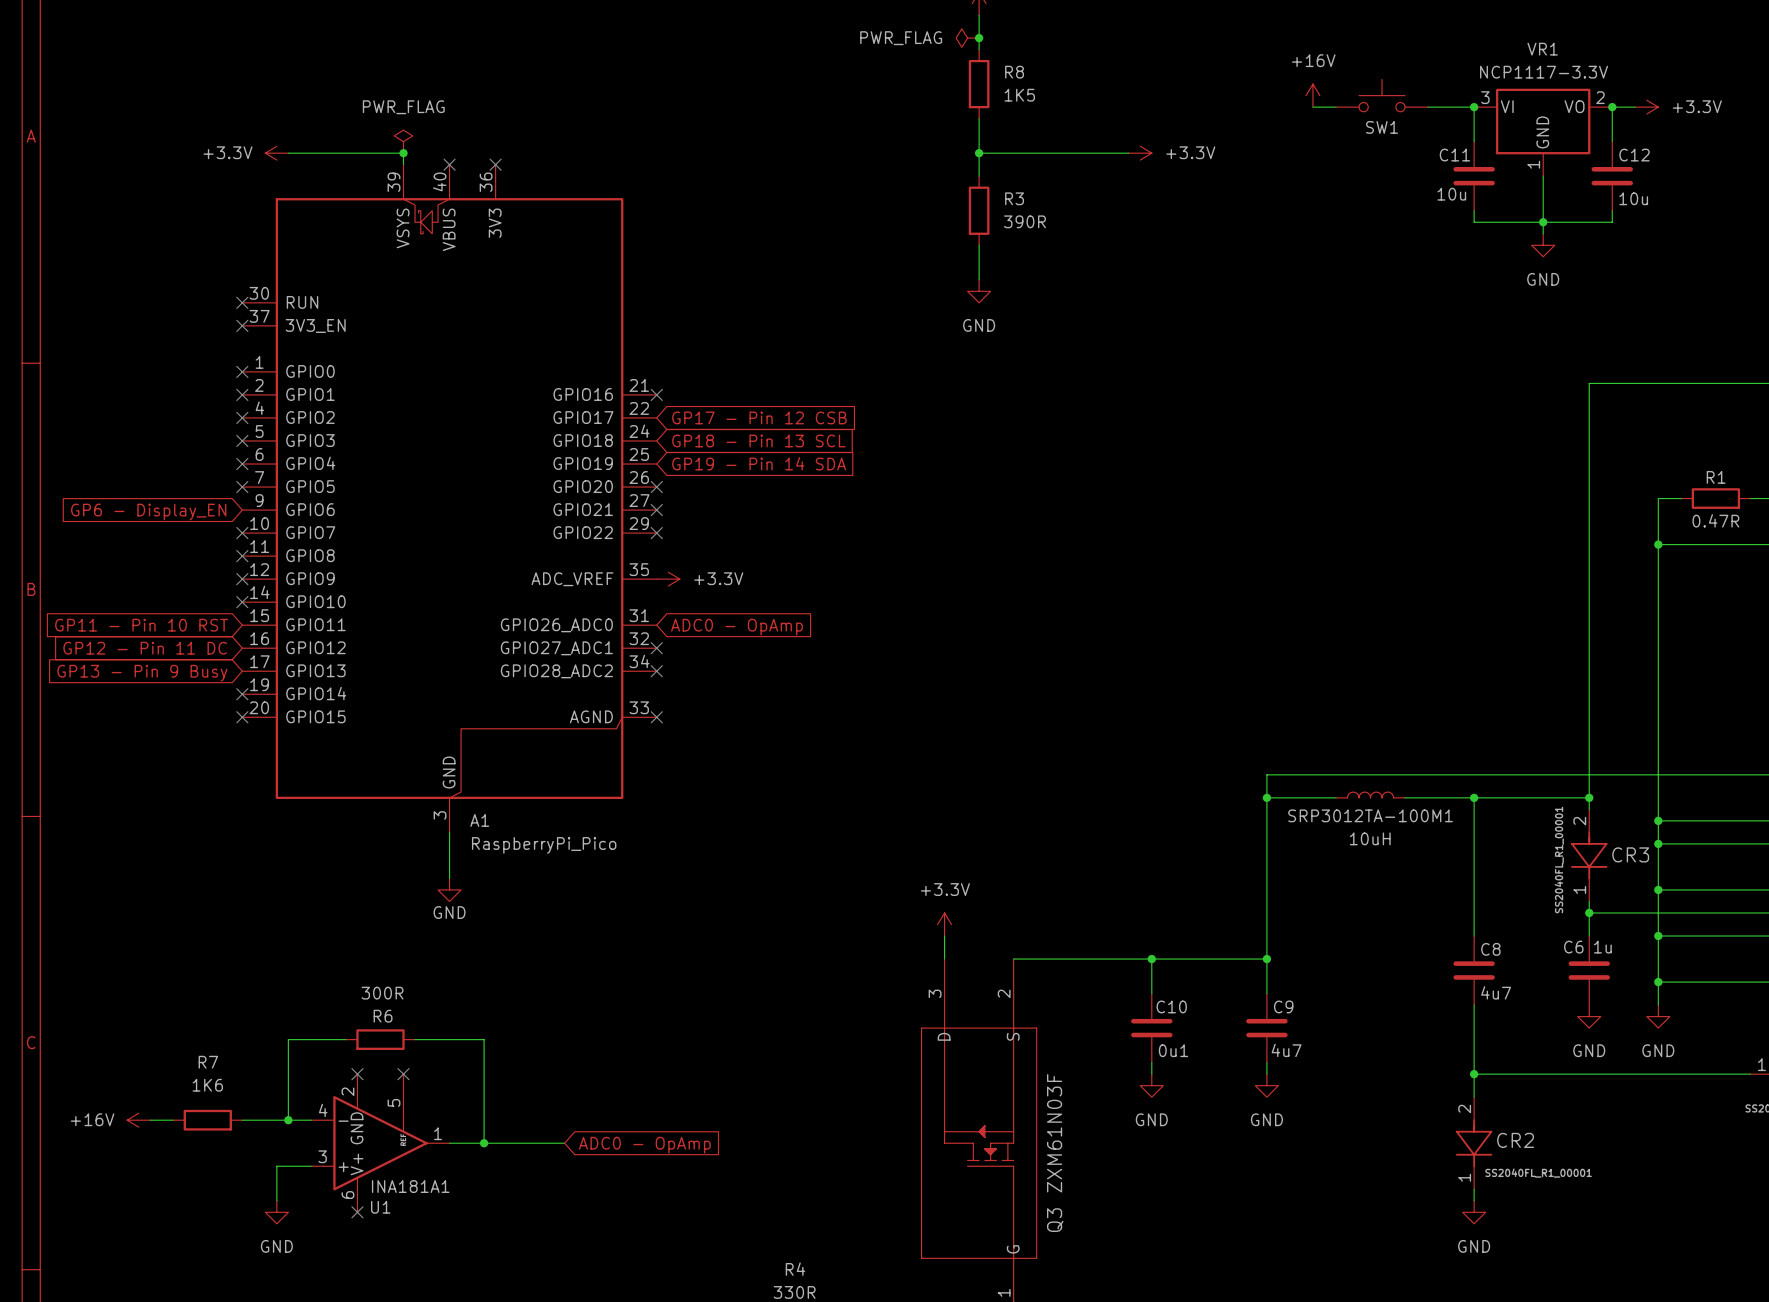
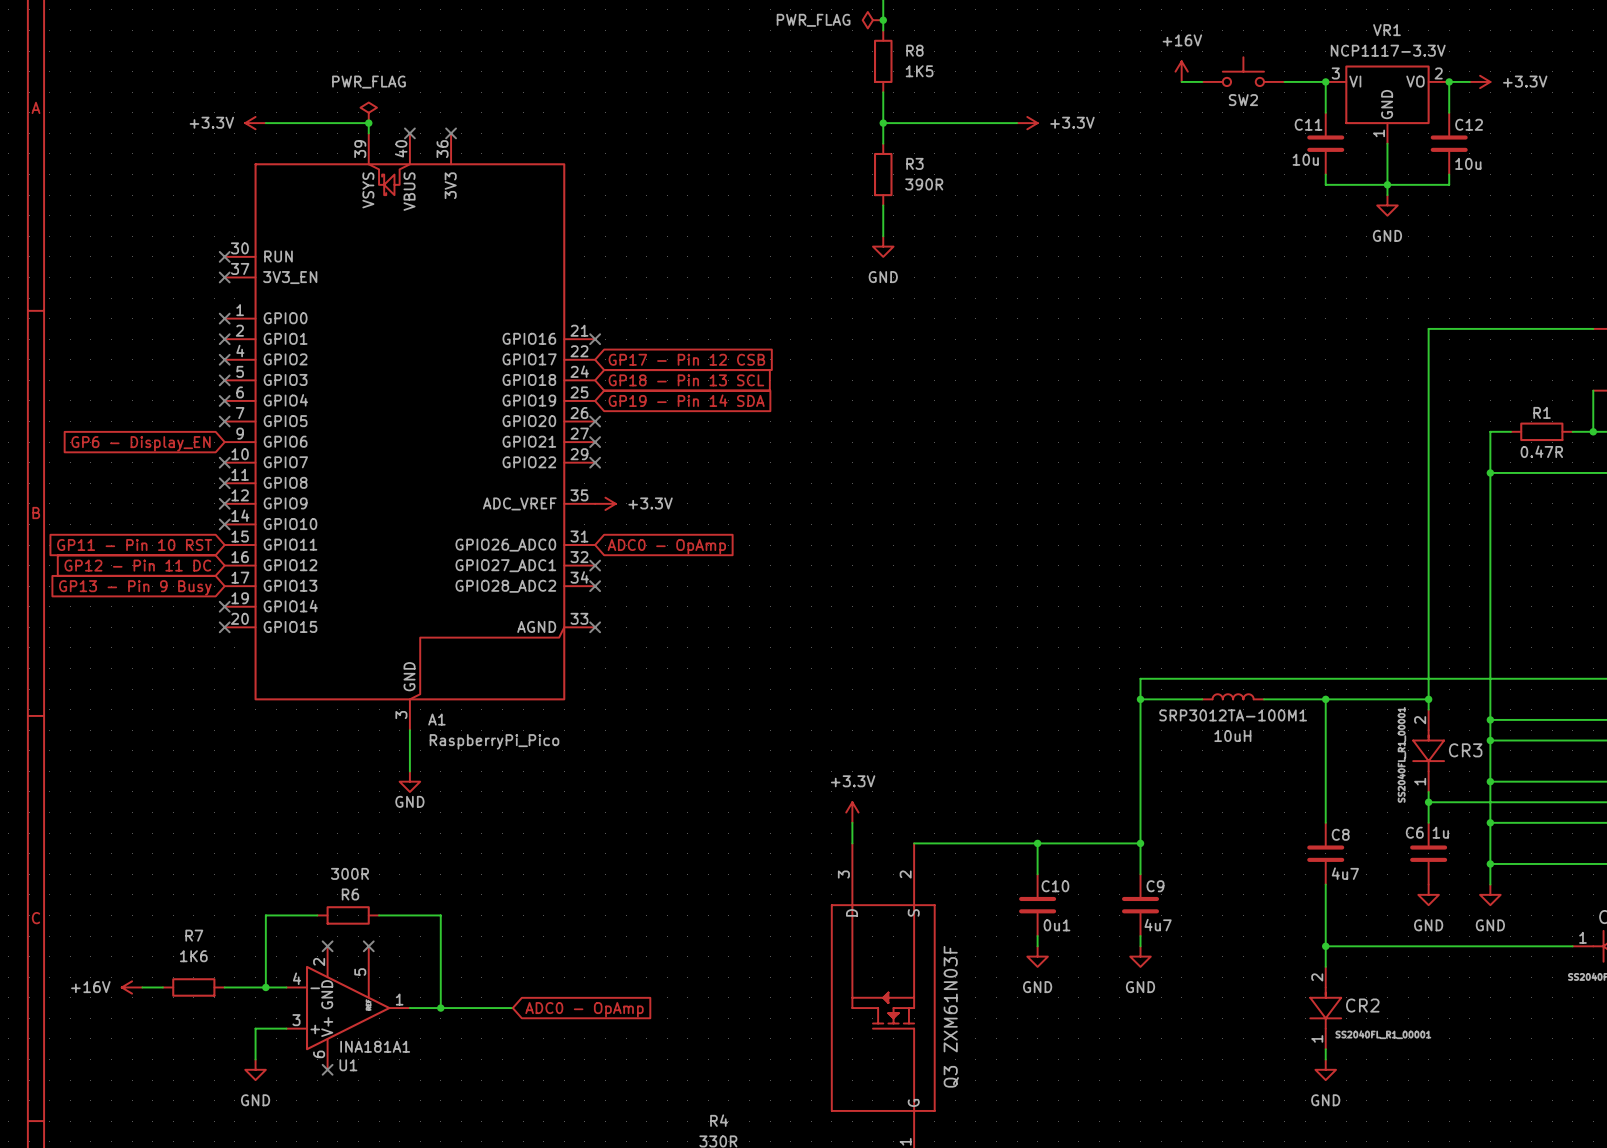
SW1 name: SW1 (1382, 127) -> SW2 (1243, 100)

